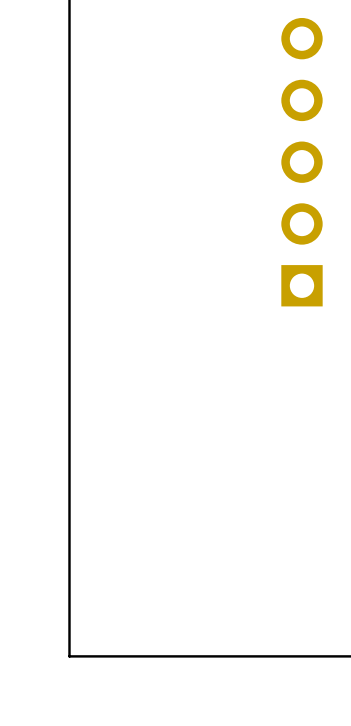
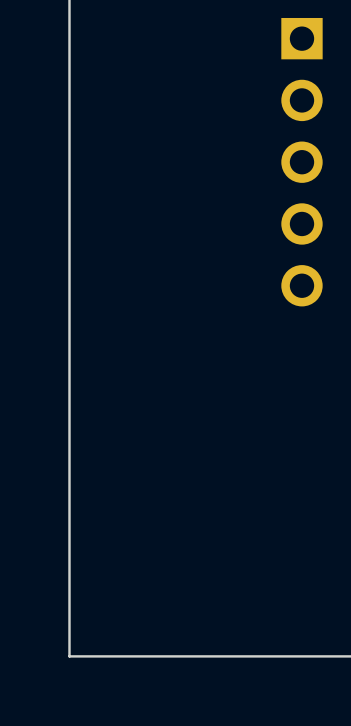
part rotation: 0° (301, 162) -> 180° (301, 162)

